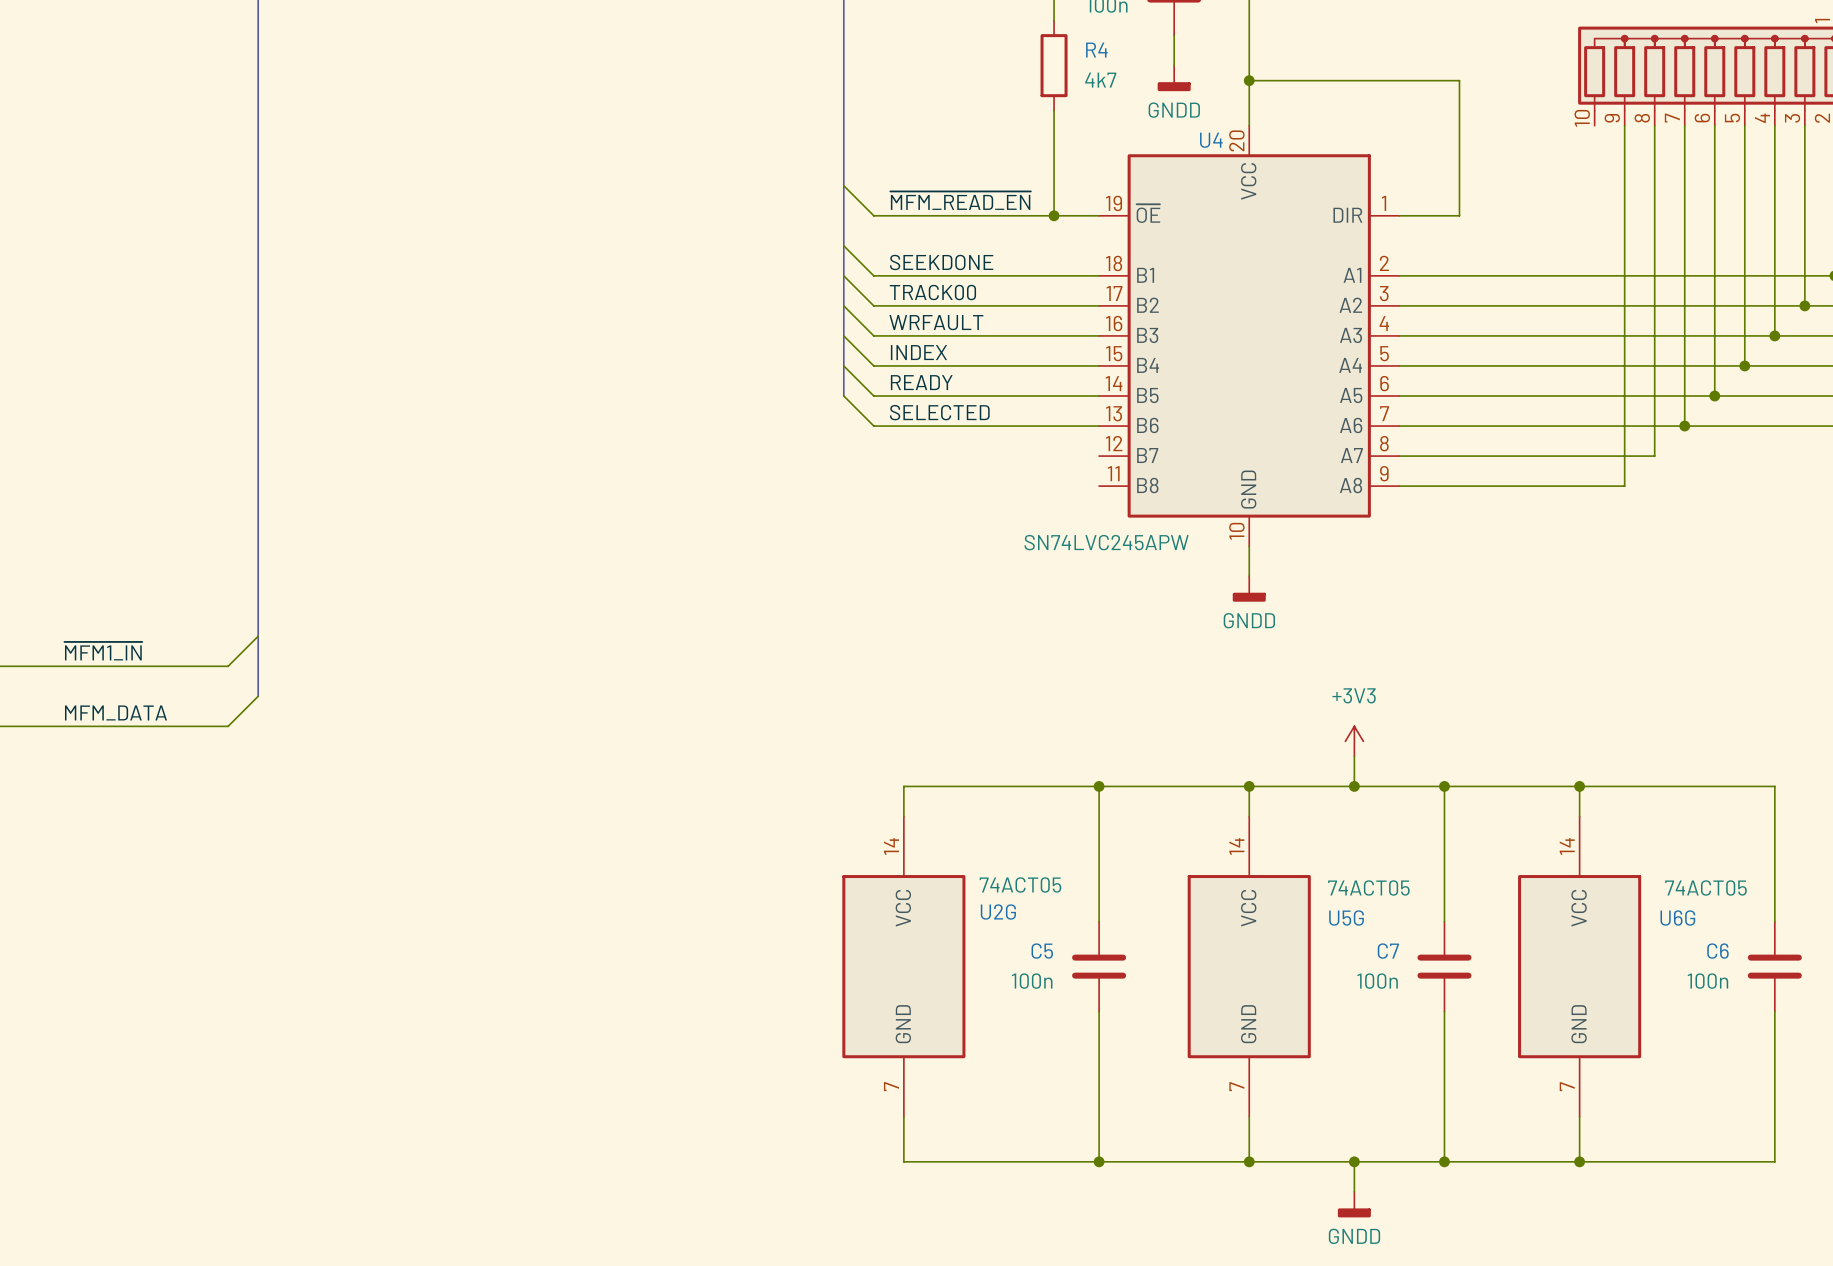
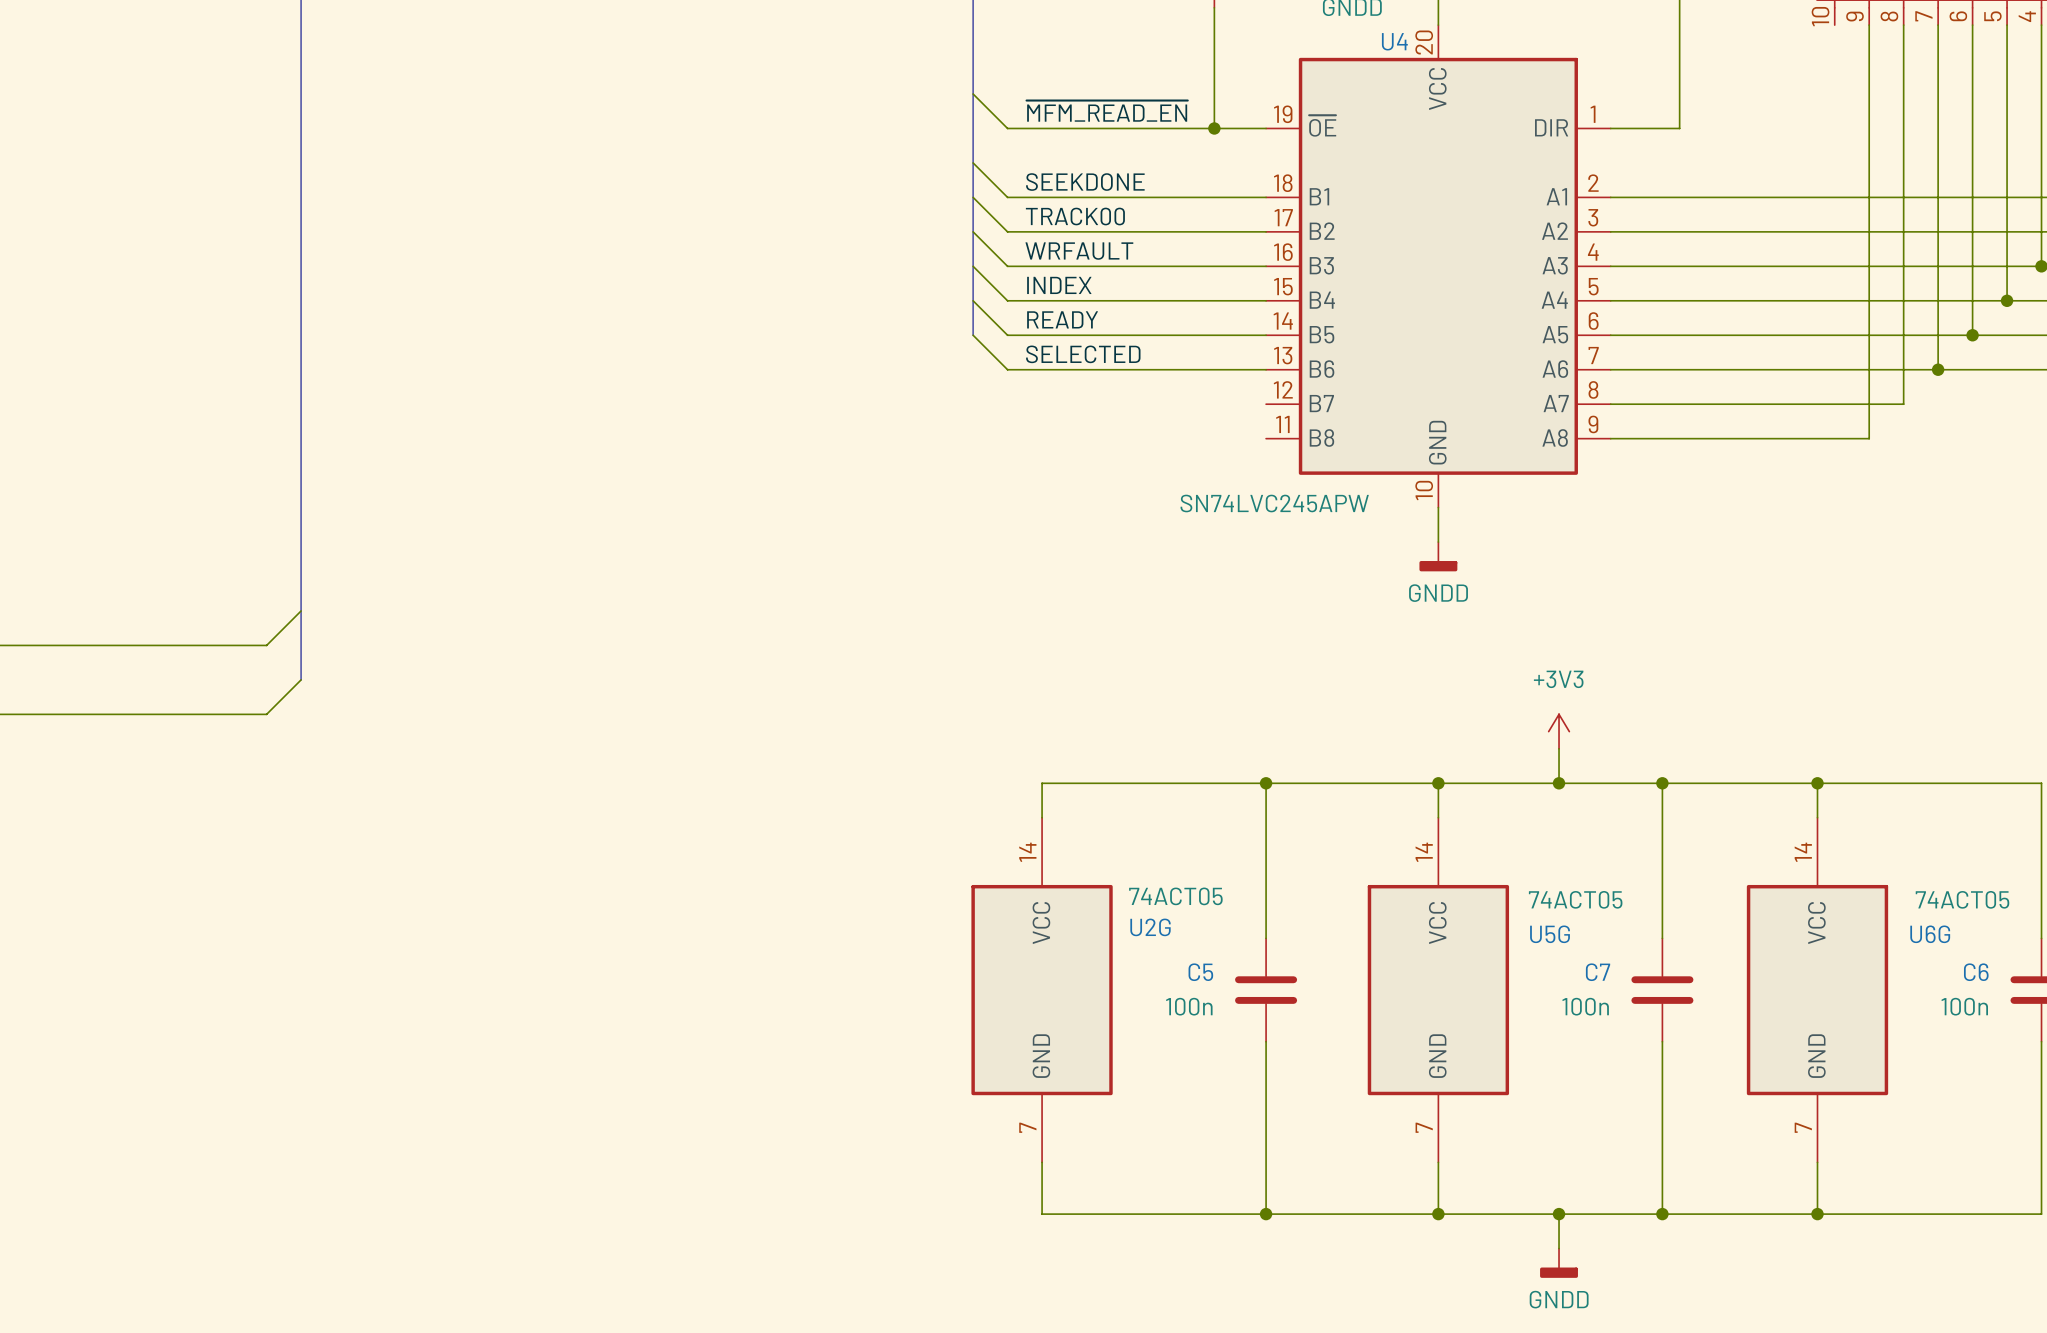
label: ~{MFM1_IN} (103, 651) -> none
label: MFM_DATA (115, 712) -> none

